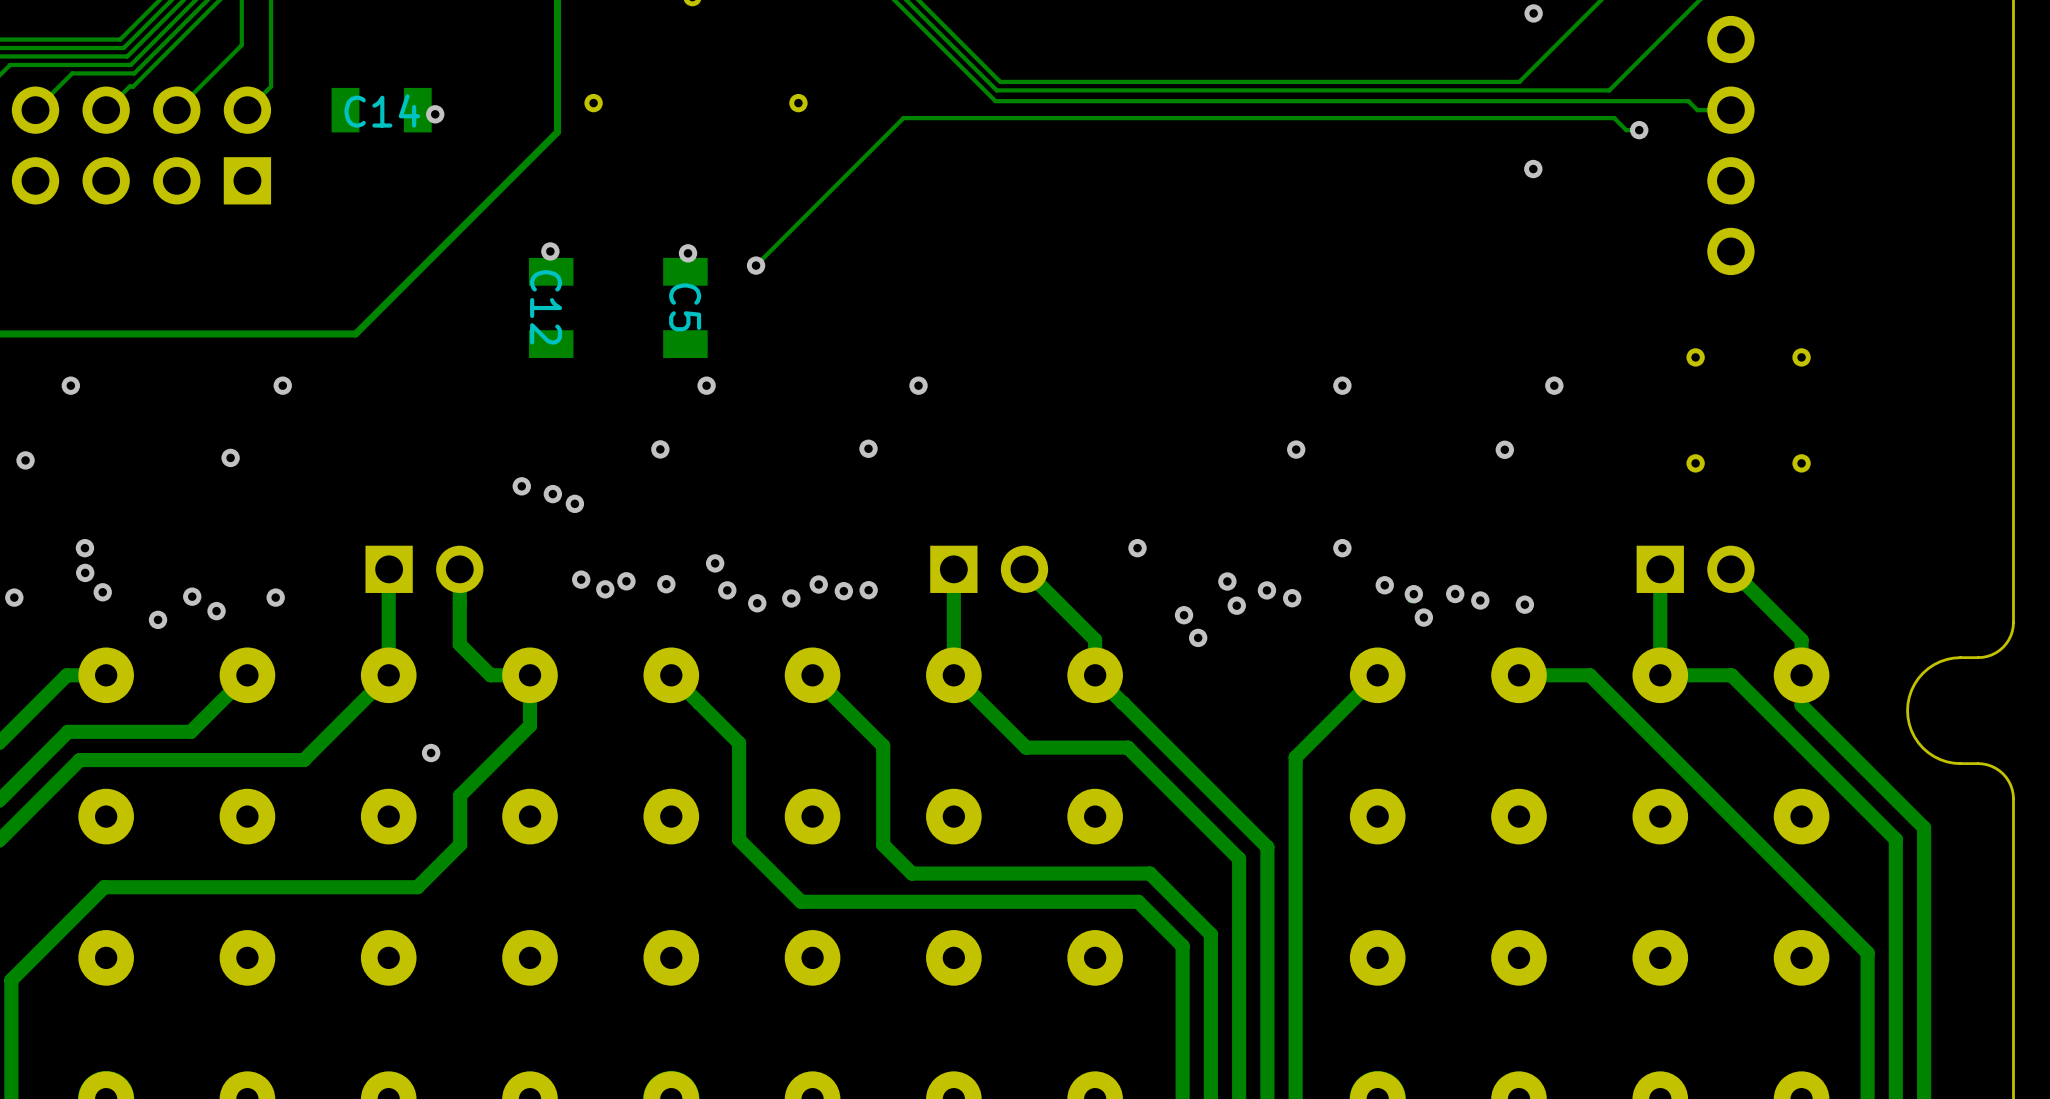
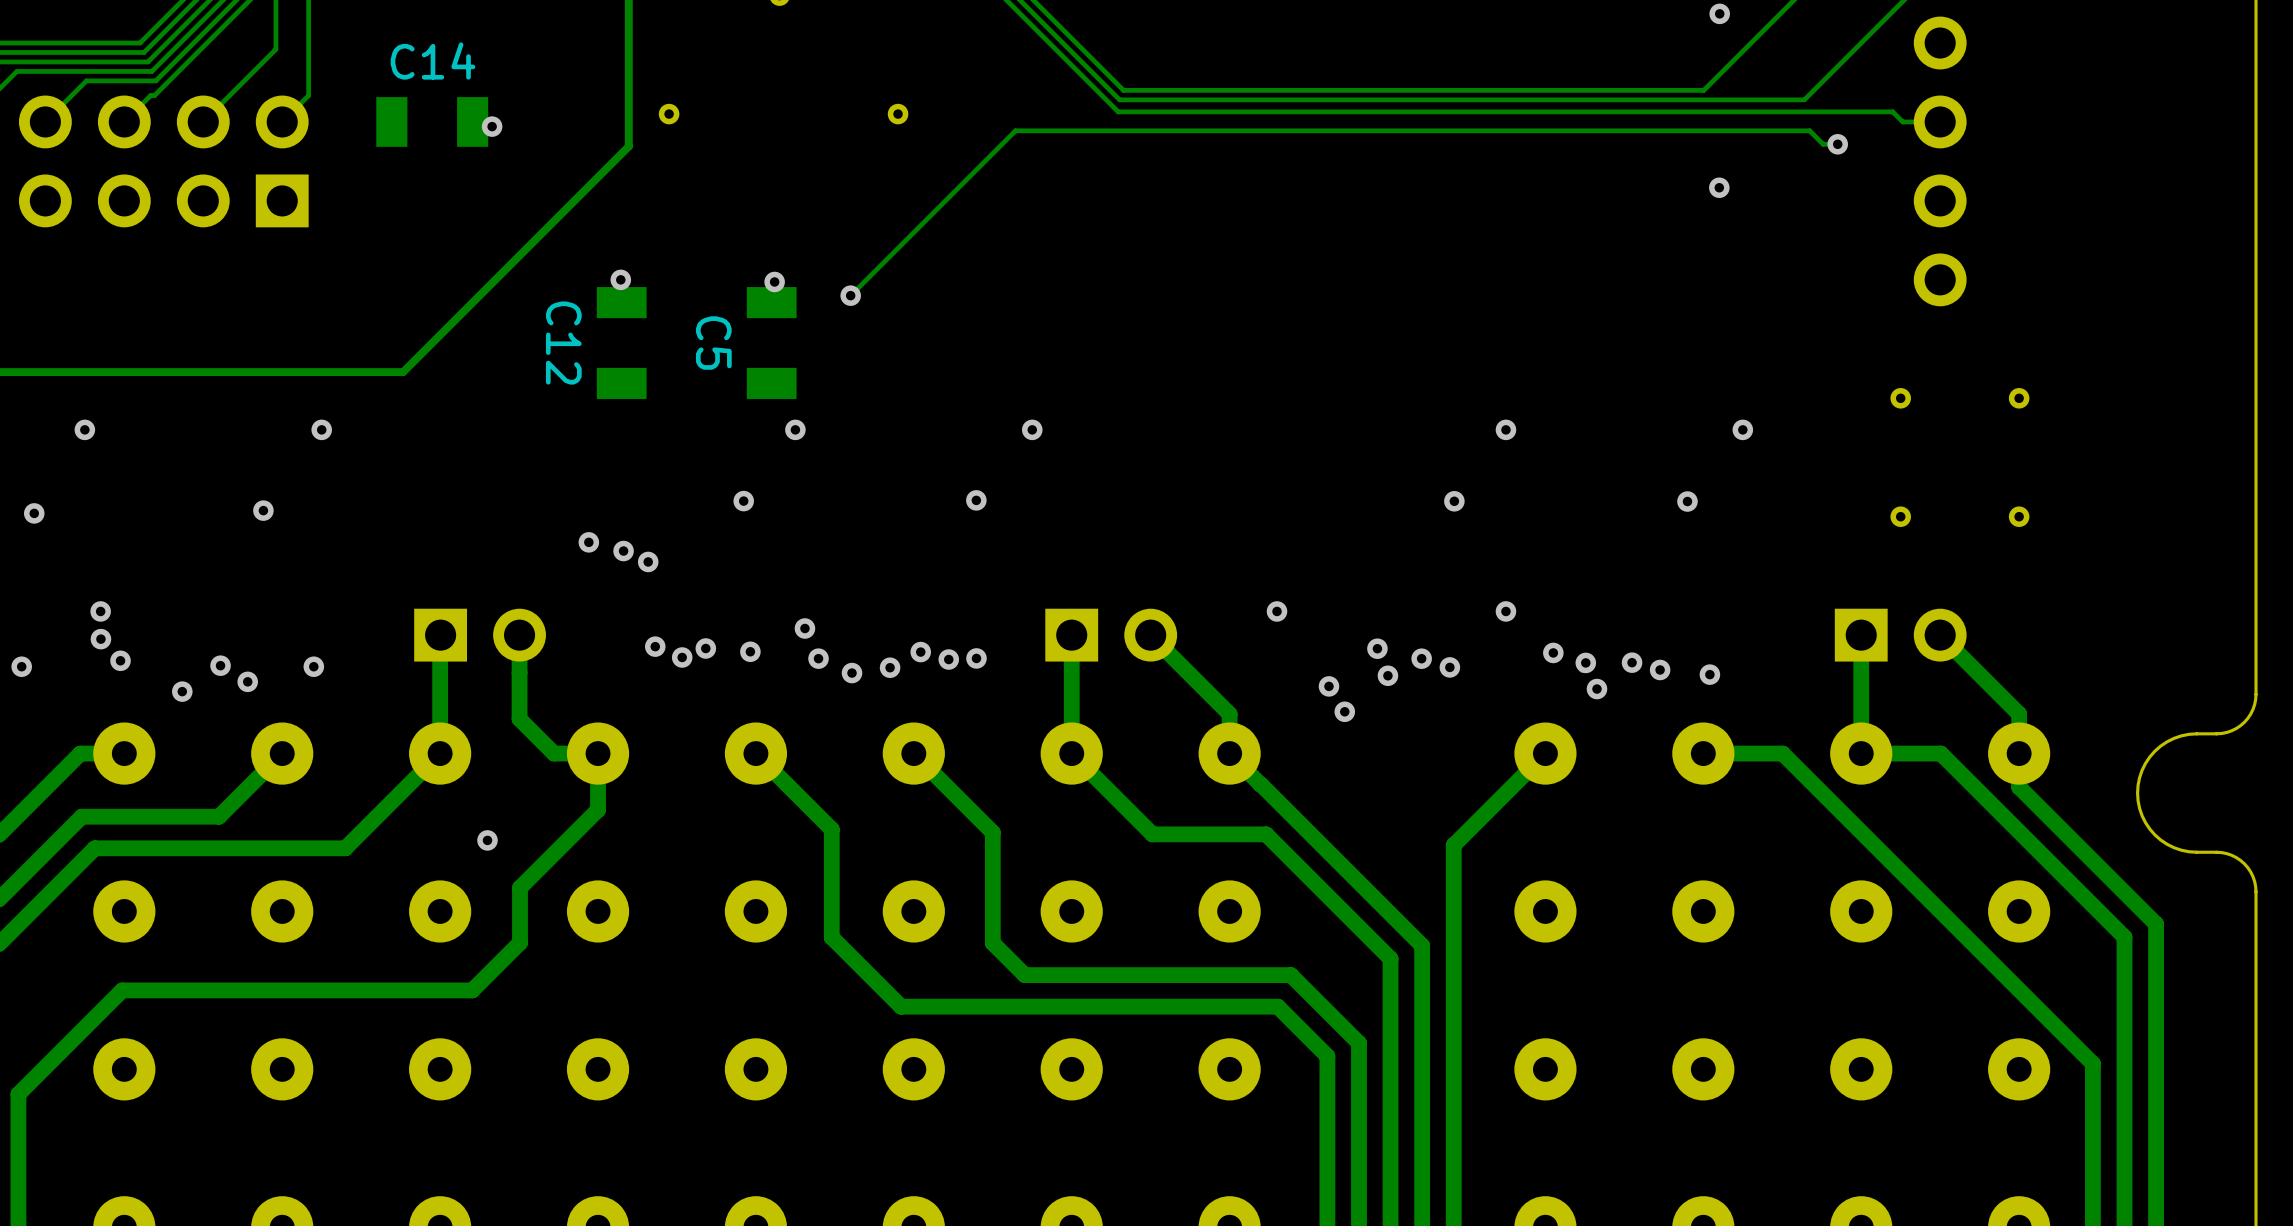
C14 name position: C14 (382, 110) -> C14 (432, 61)
C12 name position: C12 (546, 307) -> C12 (563, 343)
C5 name position: C5 (685, 307) -> C5 (713, 343)

